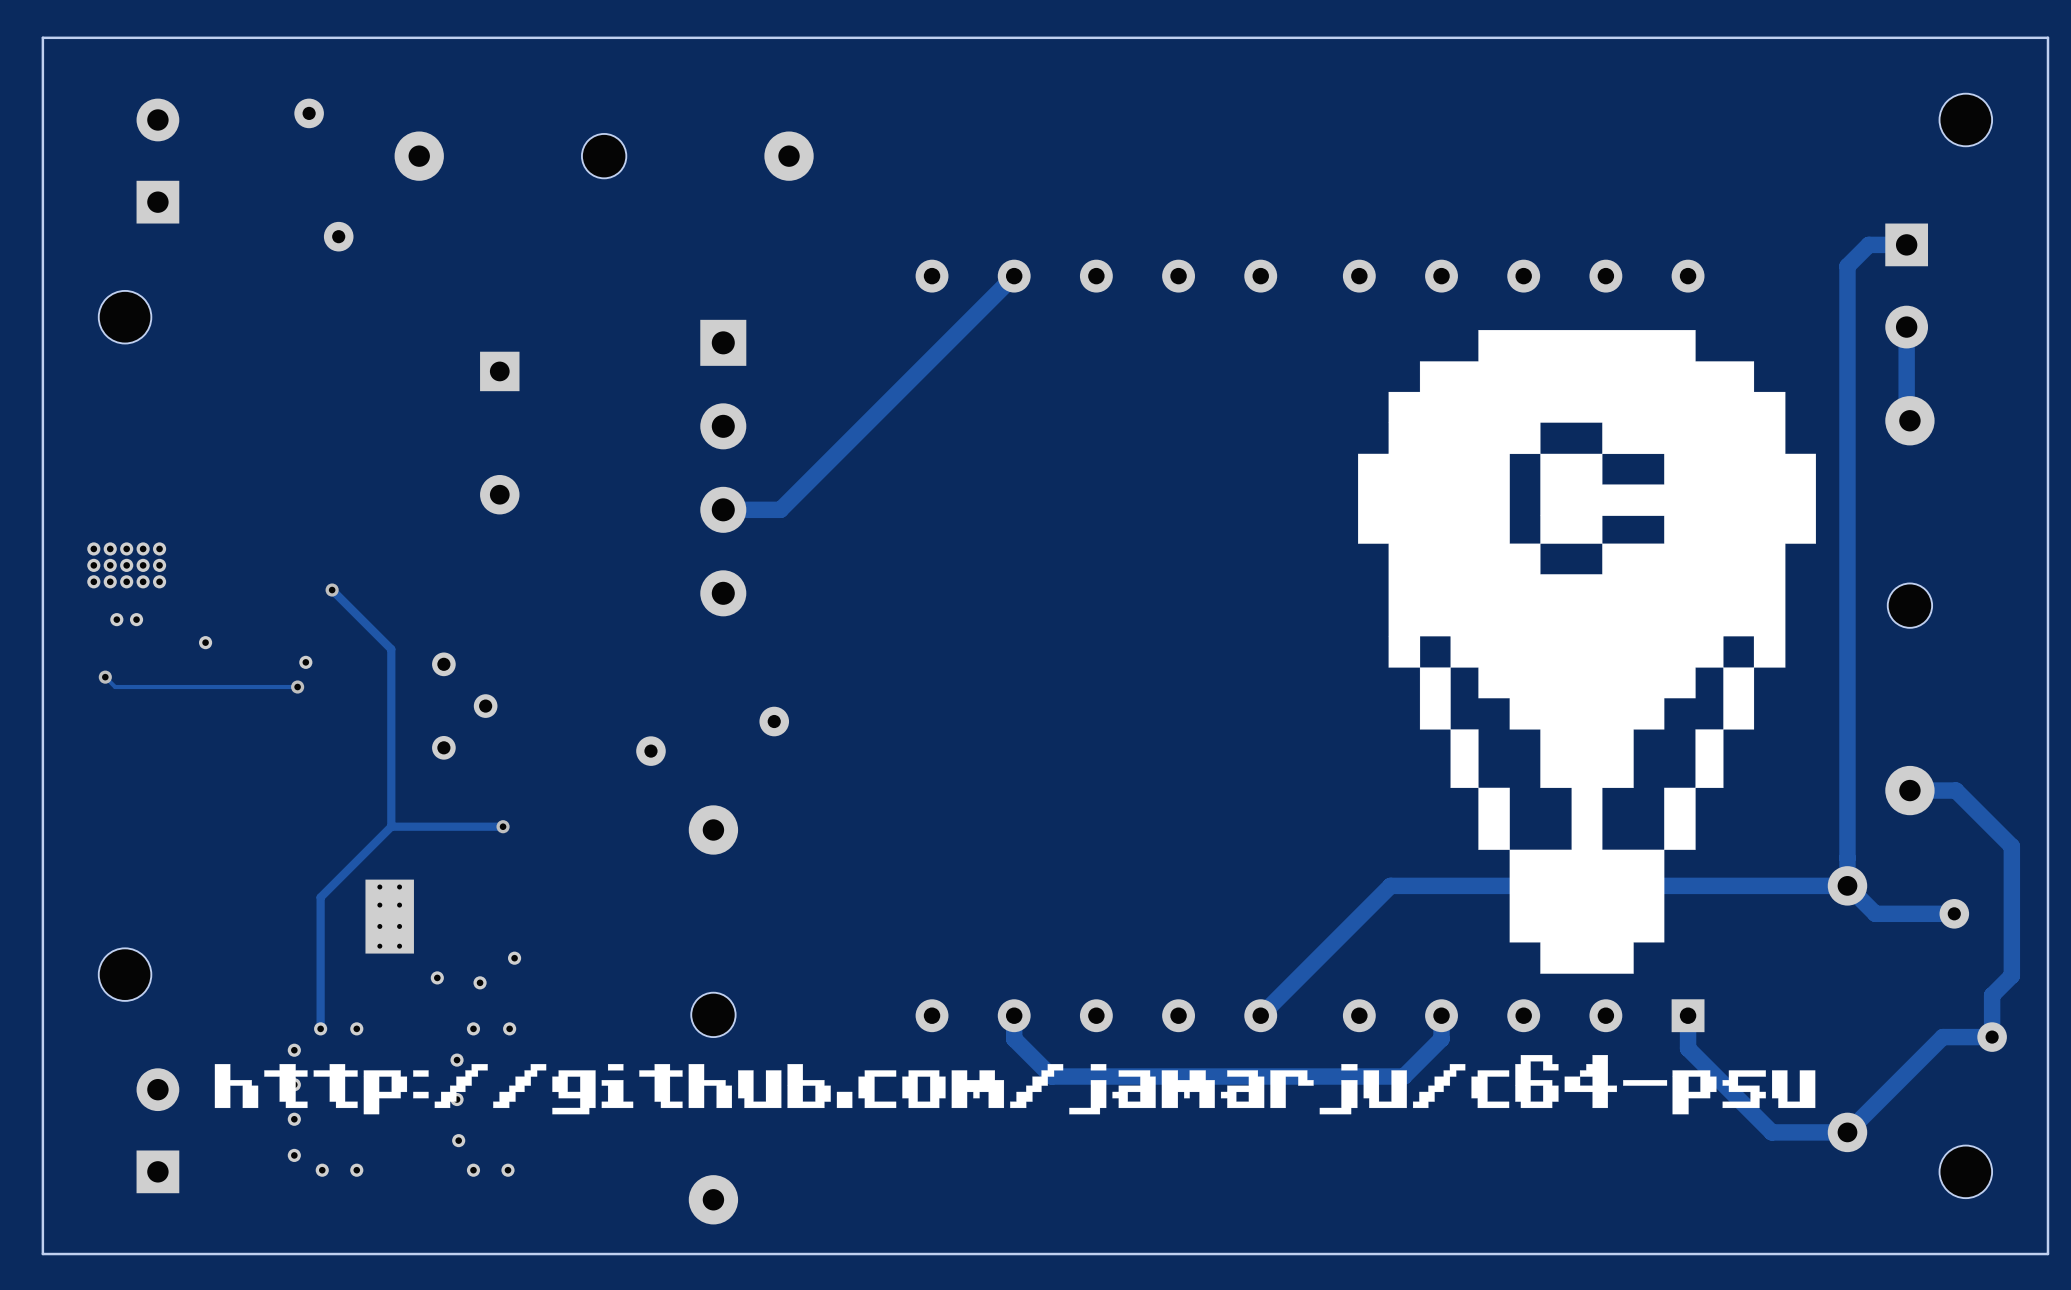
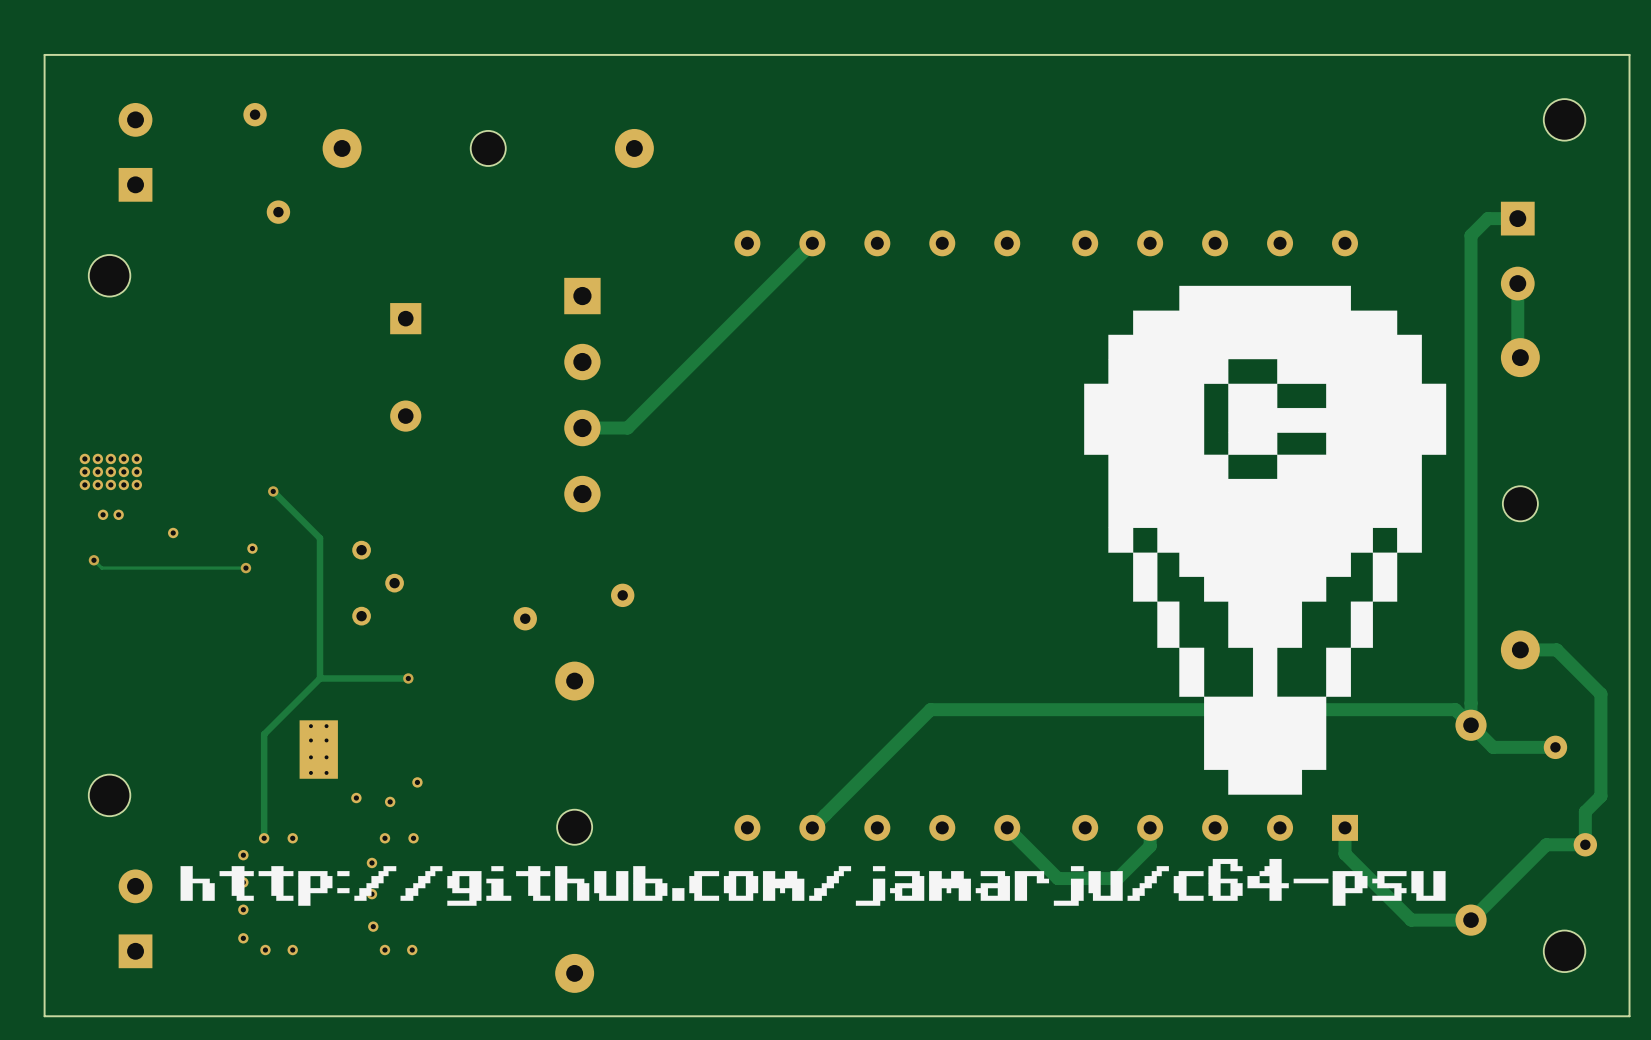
track: (1847, 885) (1390, 885) (1260, 1015) -> (1471, 725) (1455, 709) (930, 709) (812, 827)
track: (1014, 1015) (1014, 1038) (1051, 1076) (1403, 1076) -> (1007, 827) (1057, 878) (1117, 878) (1120, 875)

